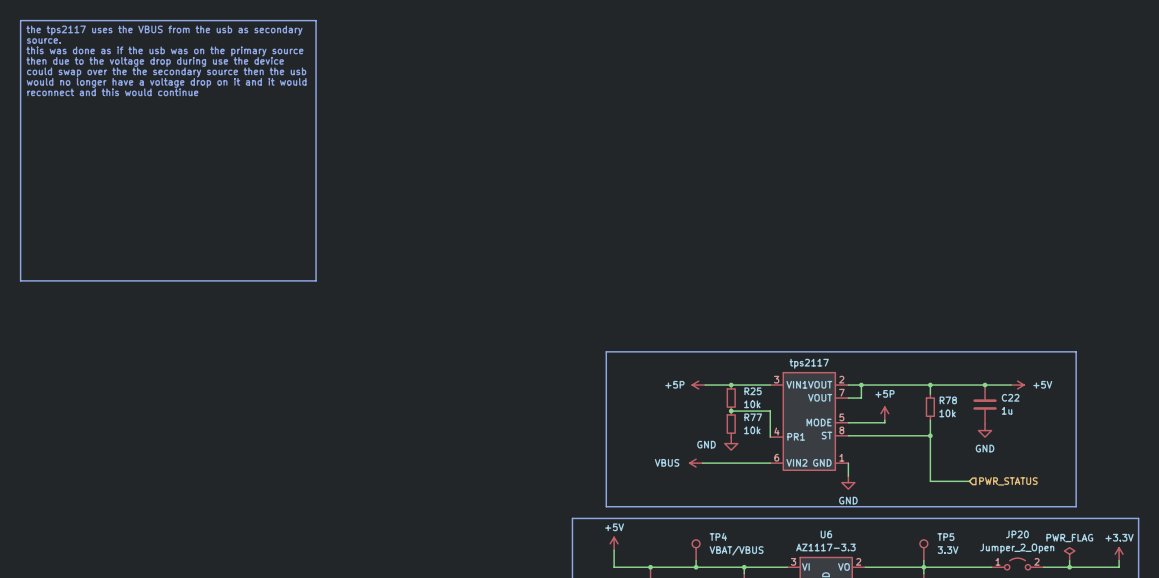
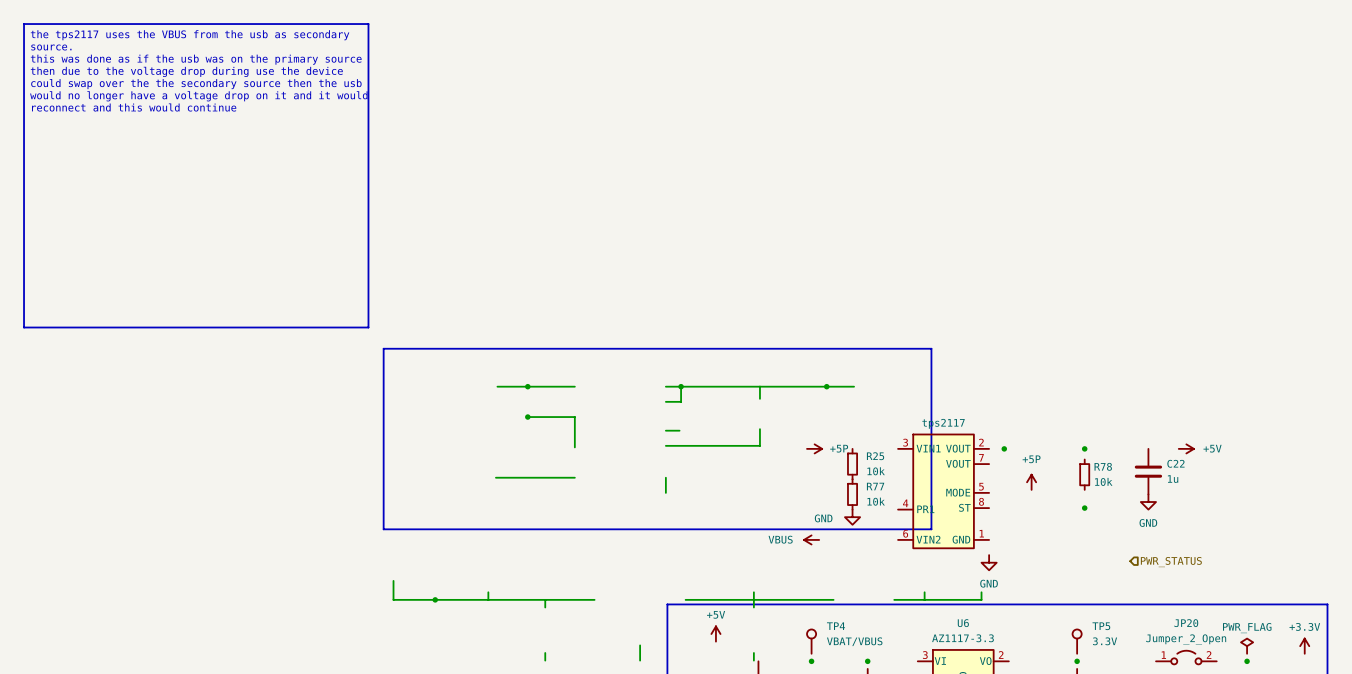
line: none -> (383, 348) (931, 348) (931, 529) (383, 529) (383, 348)
wire: none -> (497, 386) (574, 386)
junction: none -> (527, 386)
wire: none -> (665, 386) (854, 386)
wire: none -> (681, 386) (681, 401) (665, 401)
junction: none -> (681, 386)
wire: none -> (759, 386) (759, 398)
junction: none -> (826, 386)
line: (606, 351) (1076, 351) (1076, 506) (606, 506) (606, 351) -> none
wire: none -> (527, 417) (574, 417) (574, 447)
junction: none -> (527, 417)
wire: none -> (759, 429) (759, 445) (665, 445)
wire: none -> (665, 430) (679, 430)
power symbol rotation: 0° (698, 385) -> 180° (814, 448)
wire: (705, 385) (770, 385) -> none
junction: (731, 385) -> none
wire: (848, 385) (1011, 385) -> none
wire: (861, 385) (861, 398) (848, 398) -> none
wire: (930, 385) (930, 394) -> none
junction: (985, 385) -> none
wire: none -> (495, 477) (574, 477)
wire: none -> (665, 477) (665, 492)
wire: (731, 411) (770, 411) (770, 437) -> none
junction: (731, 411) -> none
wire: (884, 420) (884, 422) (848, 422) -> none
wire: (930, 420) (930, 481) (969, 481) -> none
wire: (848, 435) (930, 435) -> none
wire: (702, 463) (770, 463) -> none
wire: (848, 463) (848, 476) -> none
wire: none -> (393, 580) (393, 599) (594, 599)
wire: none -> (488, 592) (488, 599)
wire: none -> (753, 592) (753, 607)
wire: none -> (981, 592) (981, 599) (894, 599)
junction: none -> (435, 599)
wire: none -> (545, 599) (545, 607)
wire: none -> (685, 599) (833, 599)
wire: (614, 550) (614, 567) (787, 567) -> none
wire: none -> (640, 645) (640, 660)
wire: none -> (545, 652) (545, 660)
wire: (696, 560) (696, 567) -> (753, 652) (753, 660)
wire: (923, 560) (923, 573) -> none
wire: (1069, 560) (1069, 567) -> none
wire: (1119, 560) (1119, 567) (1043, 567) -> none
junction: (650, 567) -> none
wire: (744, 567) (744, 573) -> (924, 592) (924, 599)
wire: (865, 567) (991, 567) -> none

